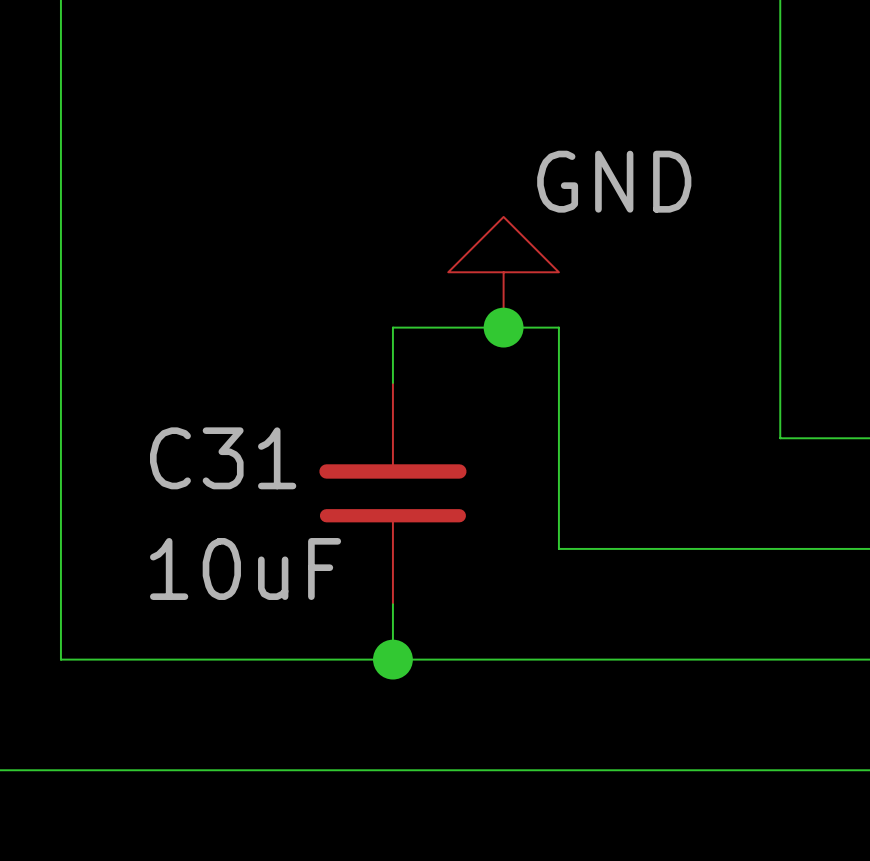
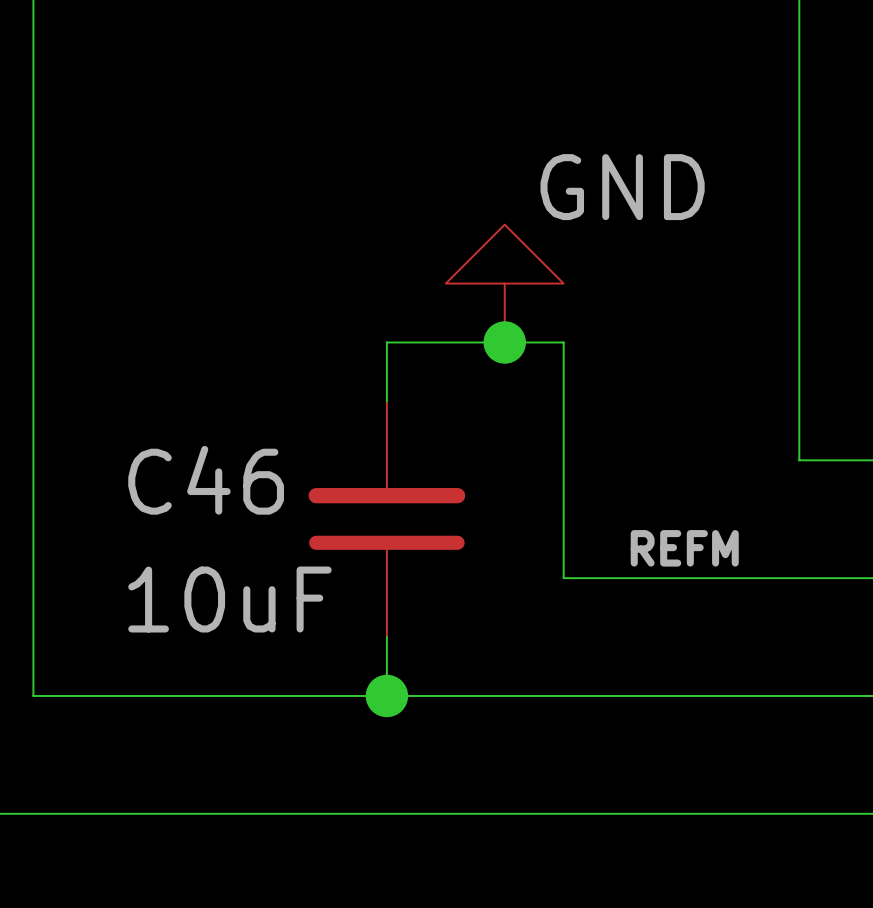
C31 name: C31 (223, 458) -> C46 (206, 480)
label: none -> REFM (684, 548)

